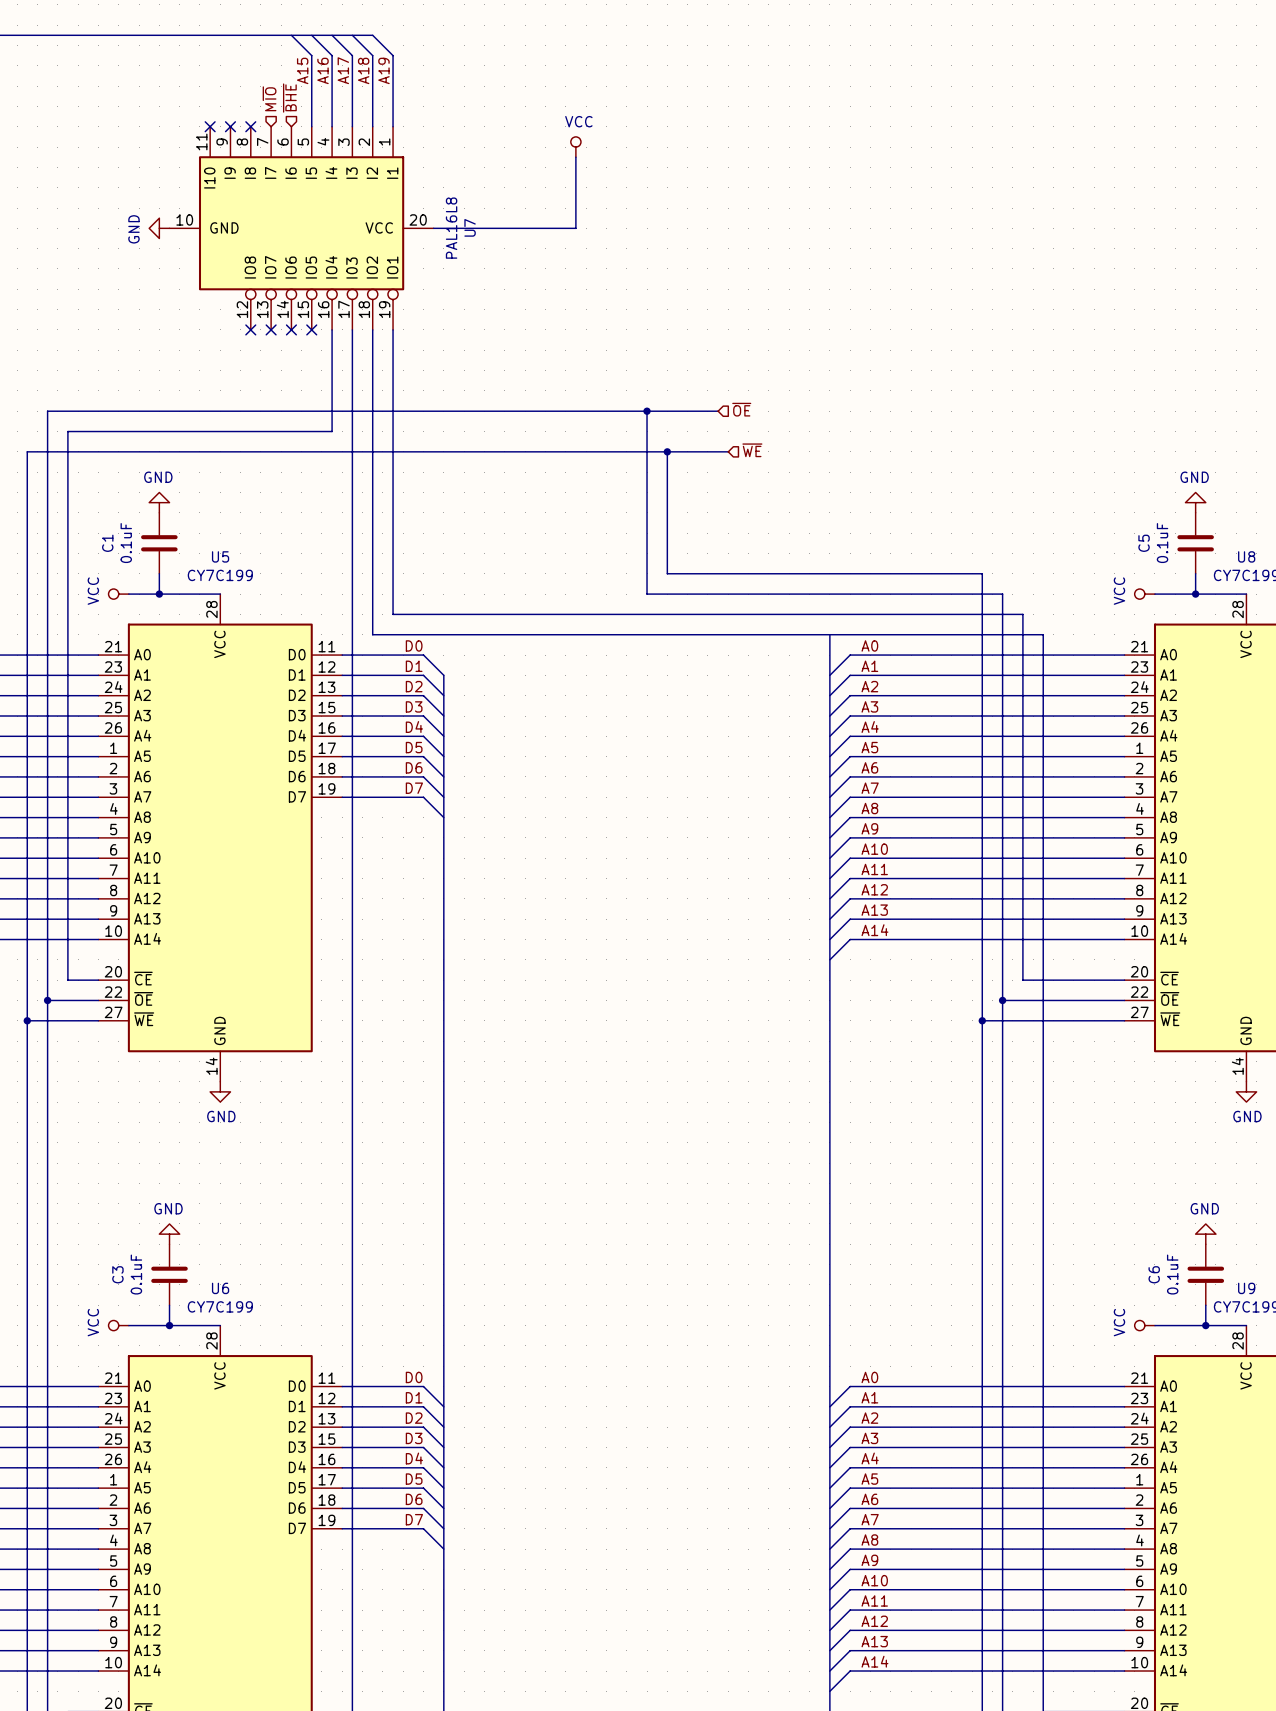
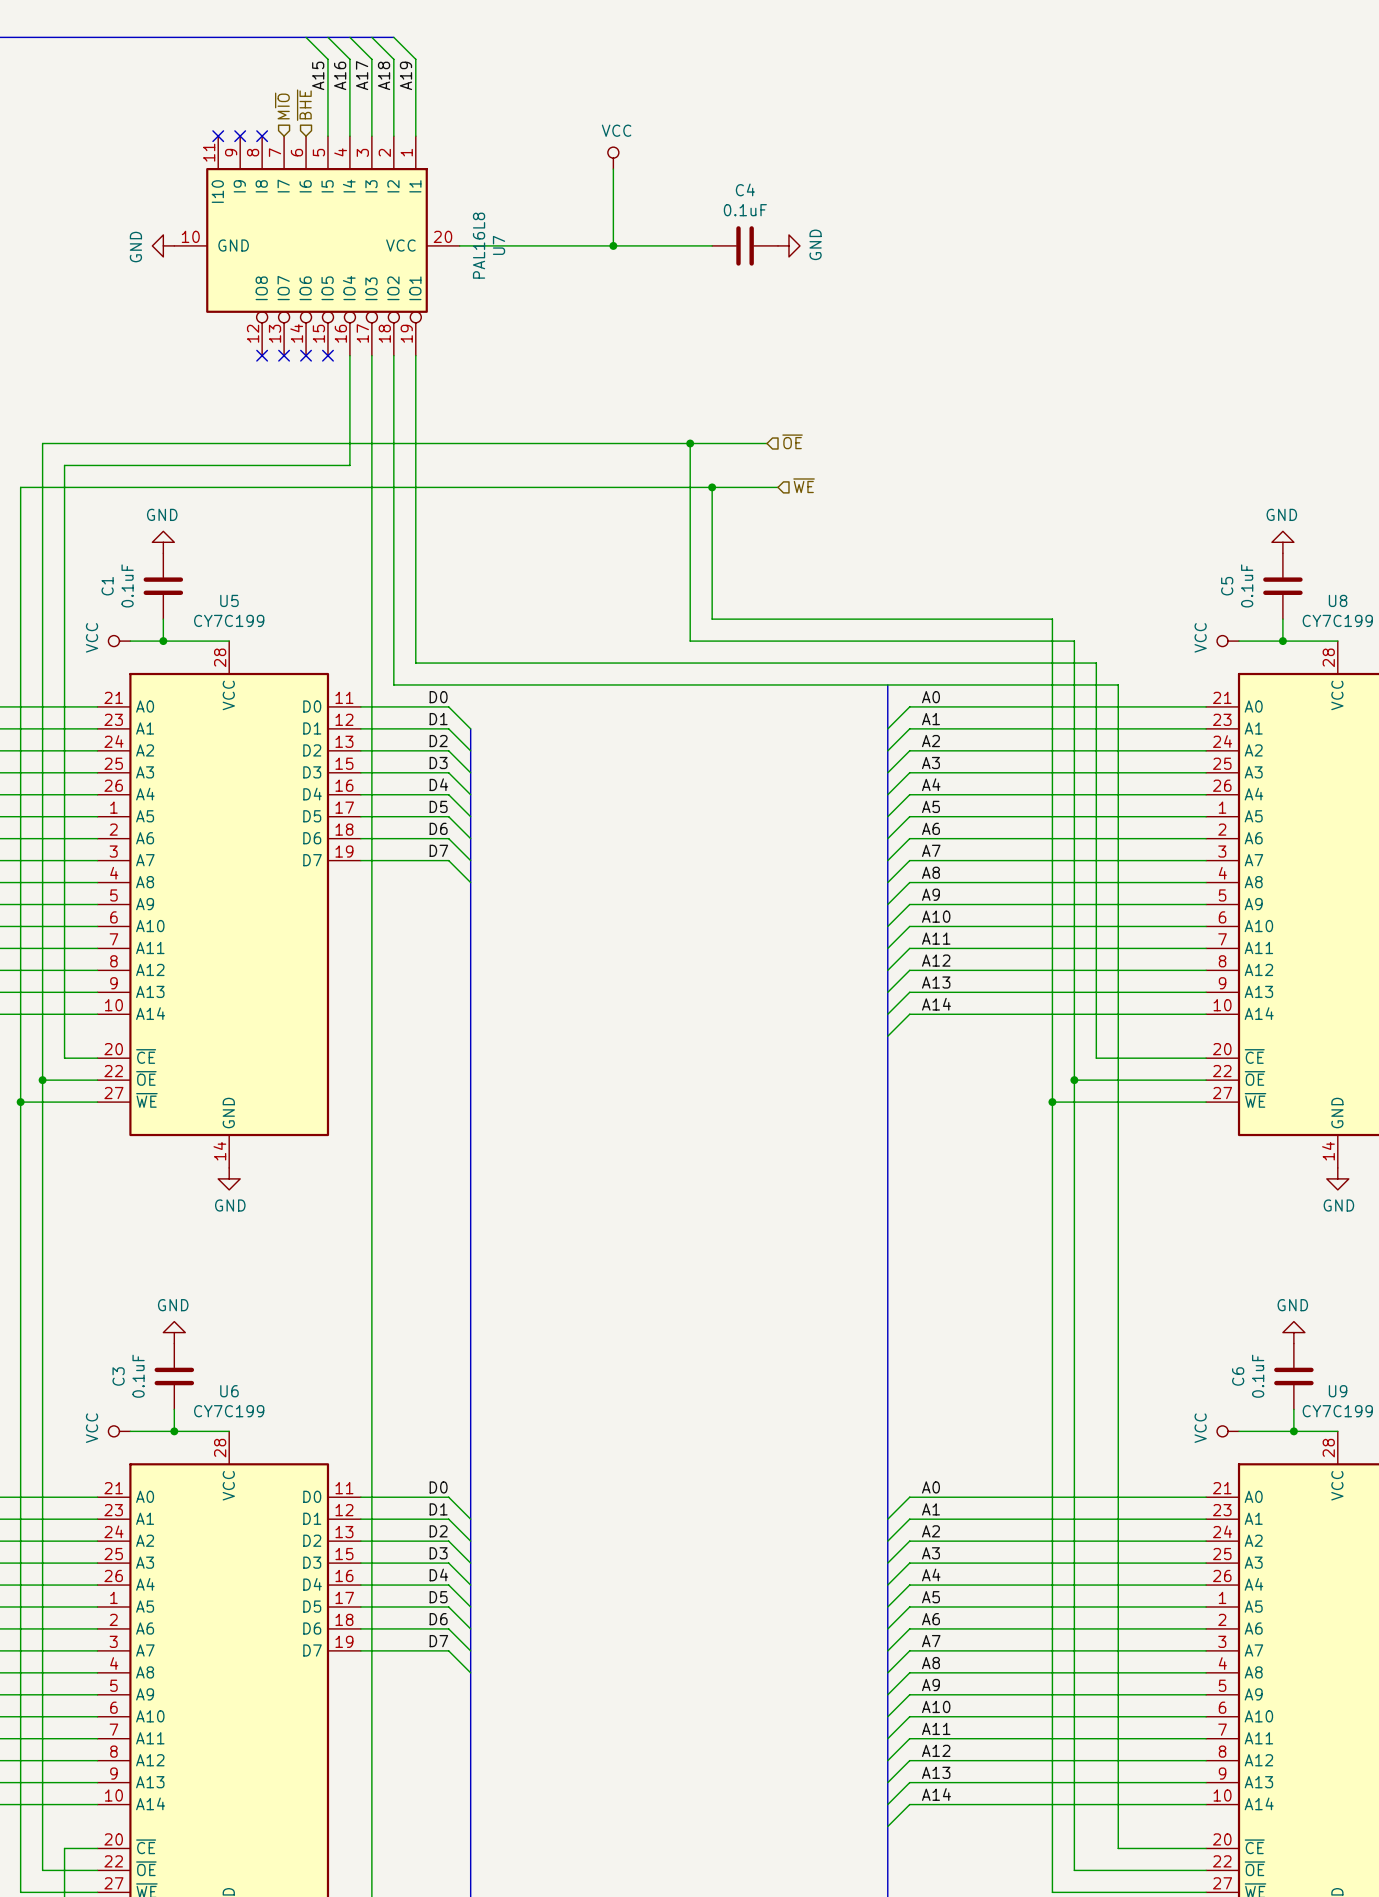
wire: none -> (613, 245) (712, 245)
junction: none -> (613, 245)
C4: none -> 0.1uF (745, 245)
power symbol: none -> GND (788, 245)

